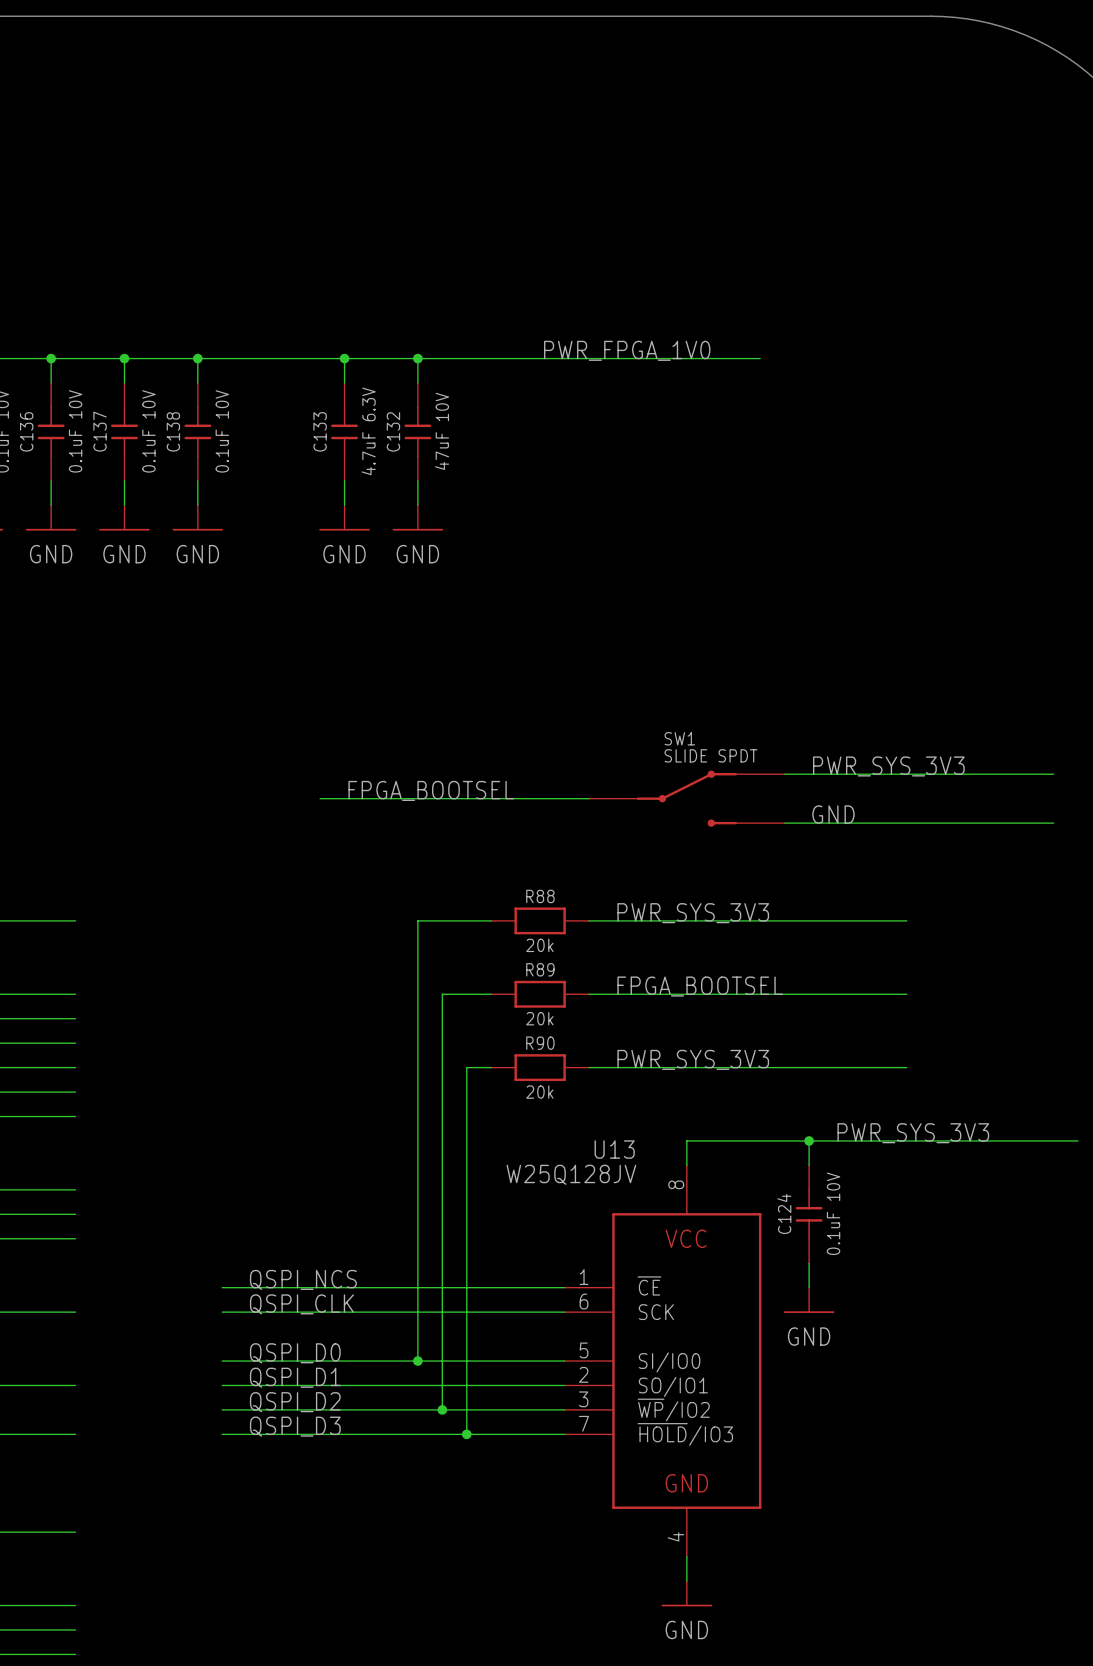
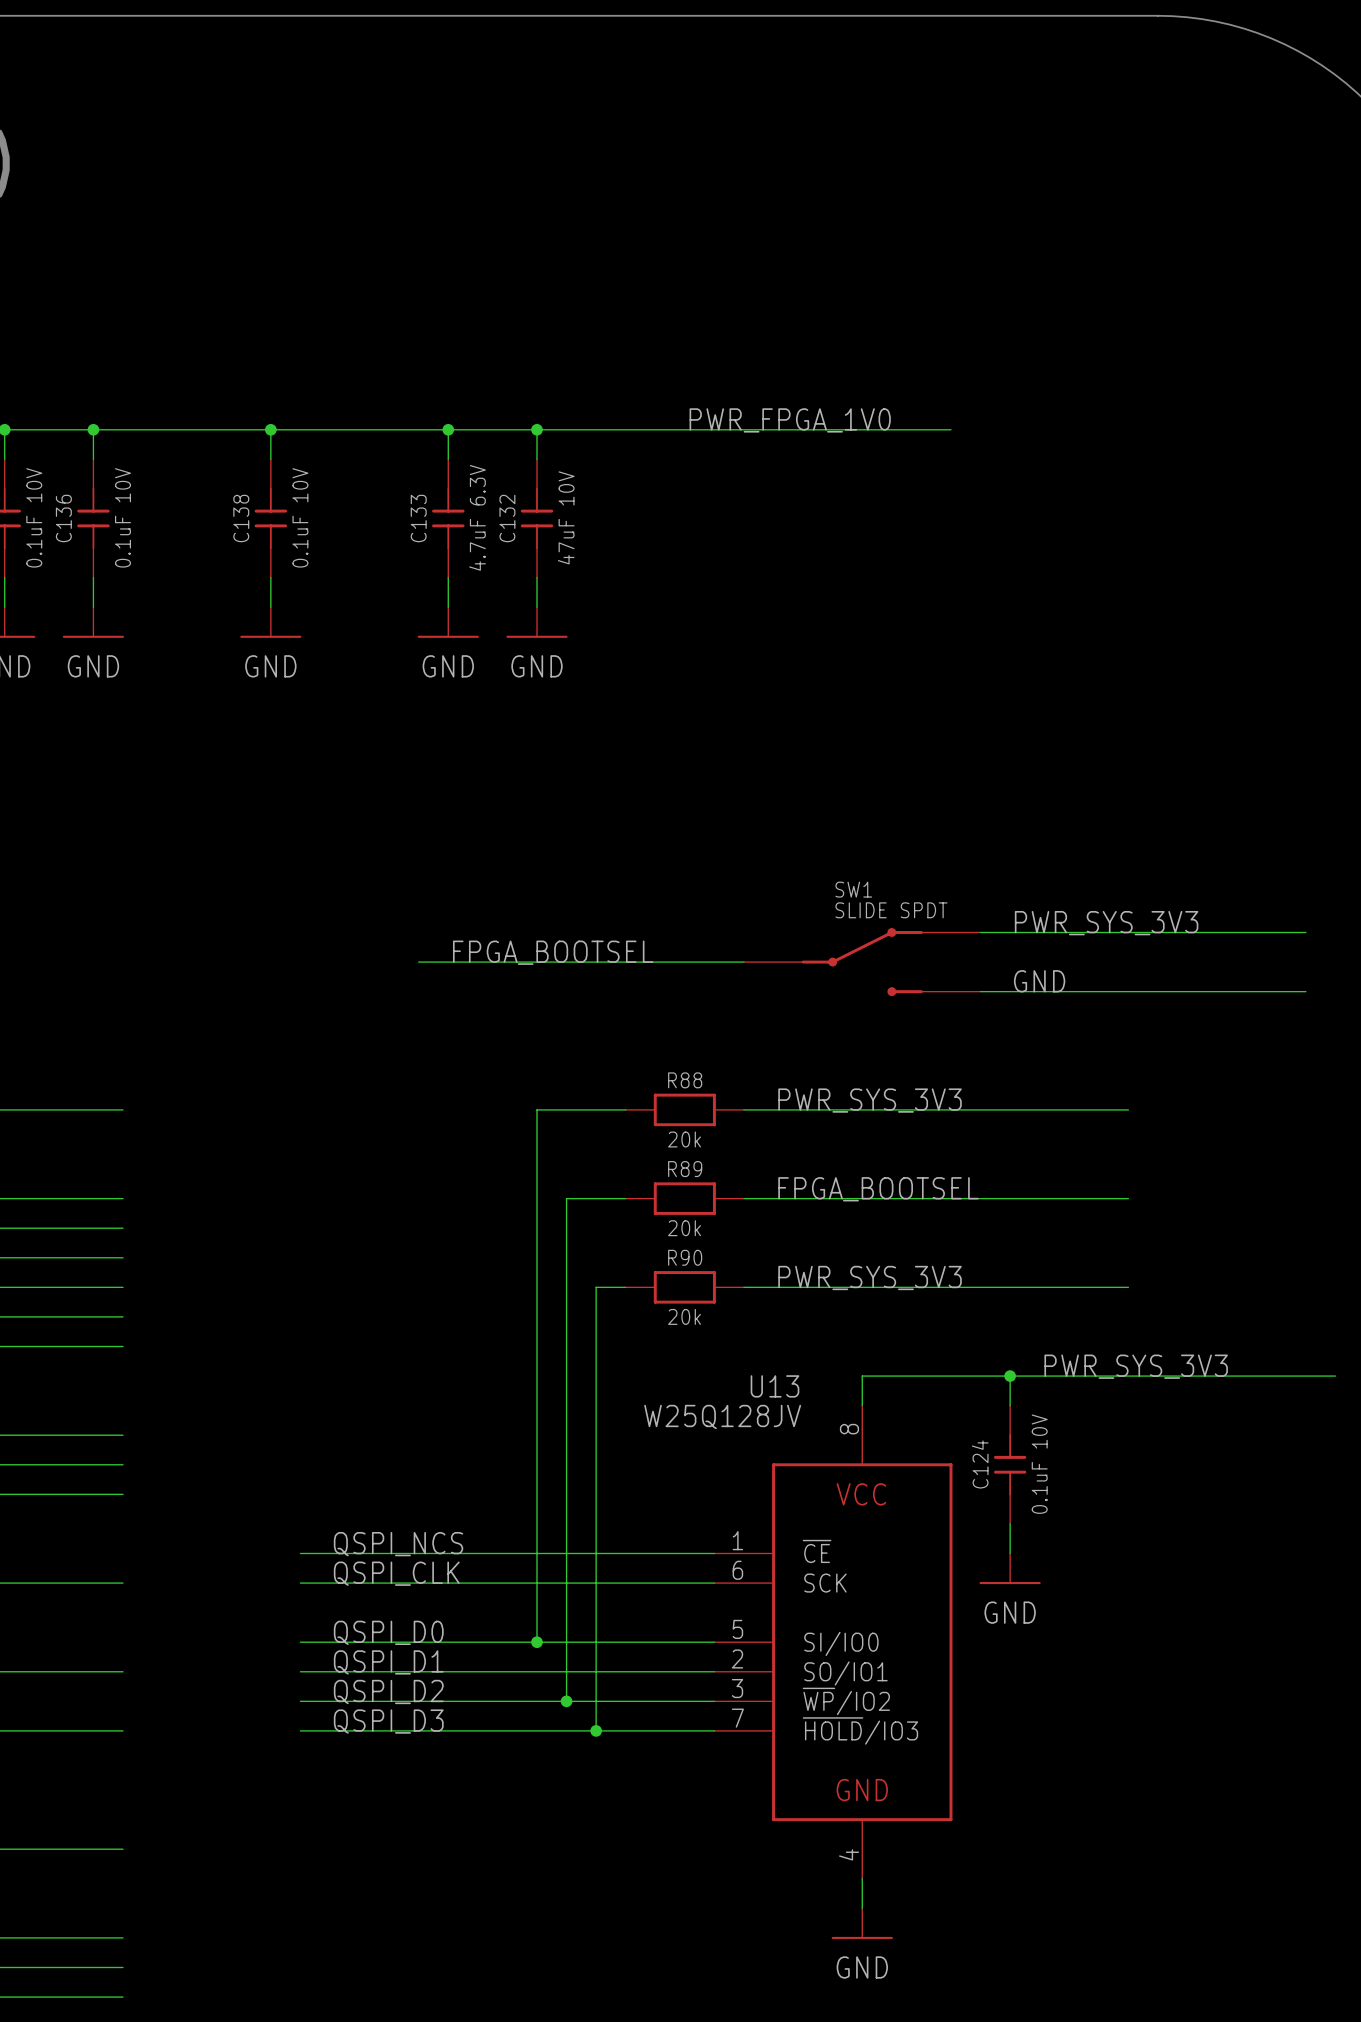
wire: (124, 358) (124, 383) -> none
junction: (124, 358) -> none
C137: 0.1uF 10V (124, 431) -> none
wire: (124, 480) (124, 505) -> none
power symbol: GND (124, 517) -> none

